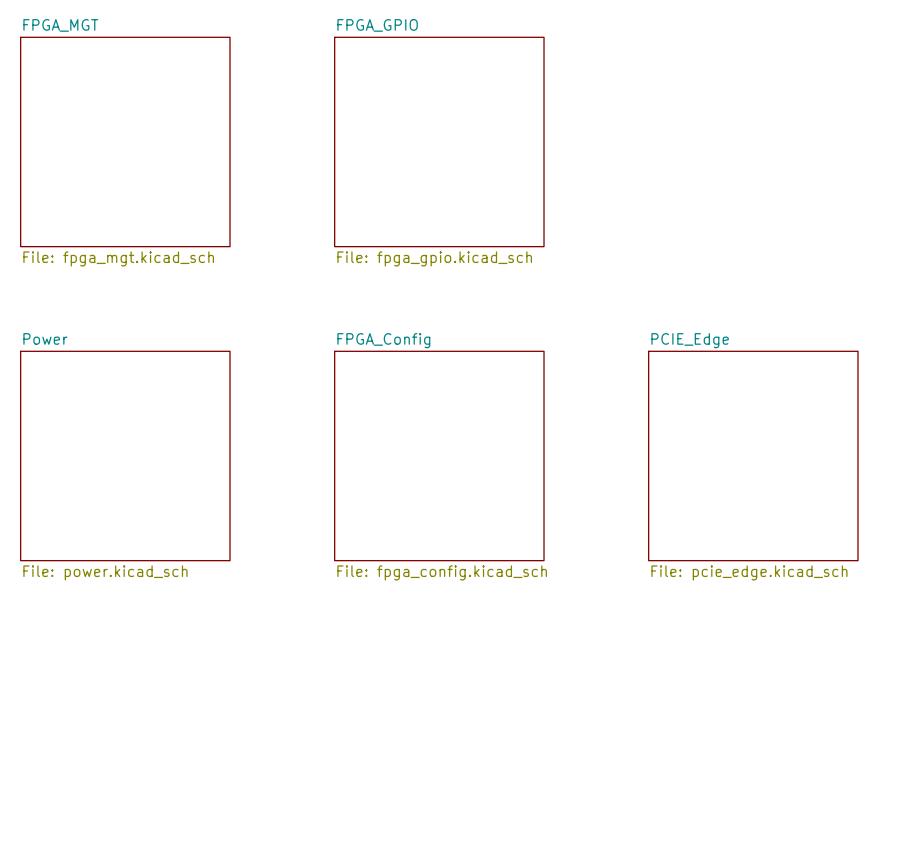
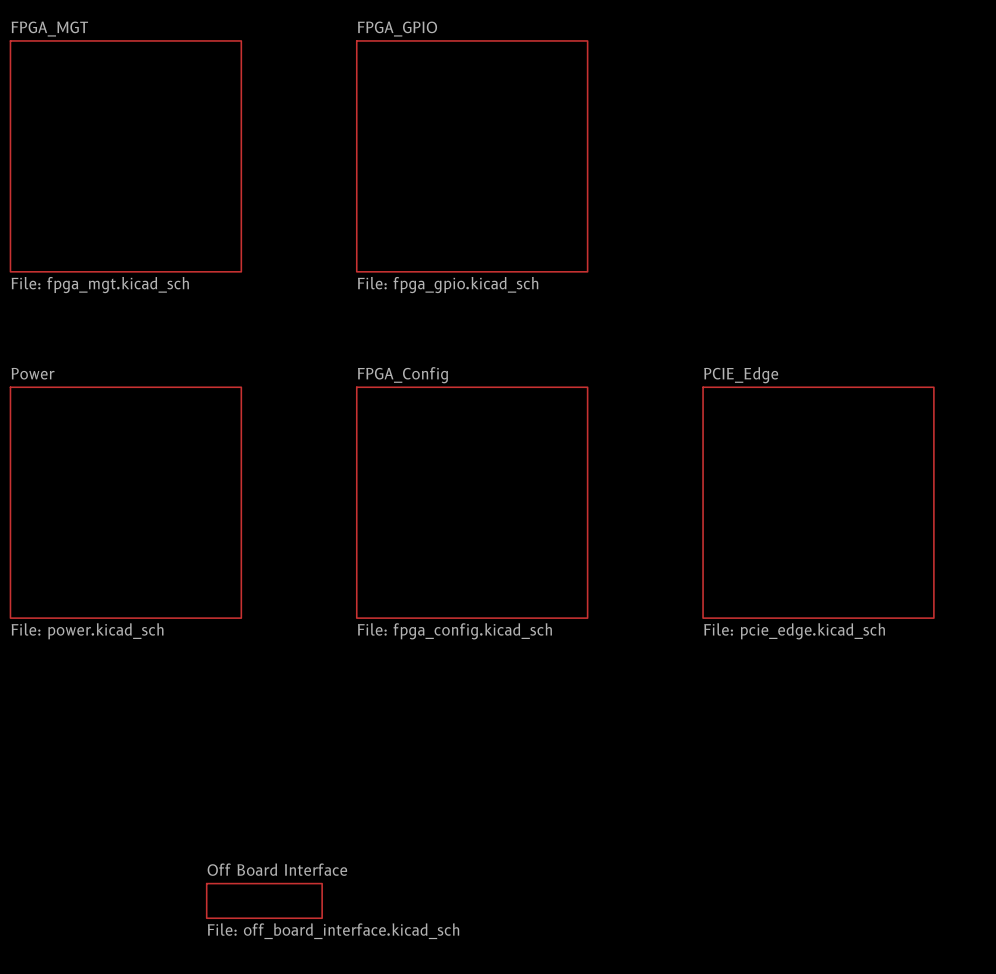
sheet Off Board Interface: none -> File: off_board_interface.kicad_sch (264, 900)

